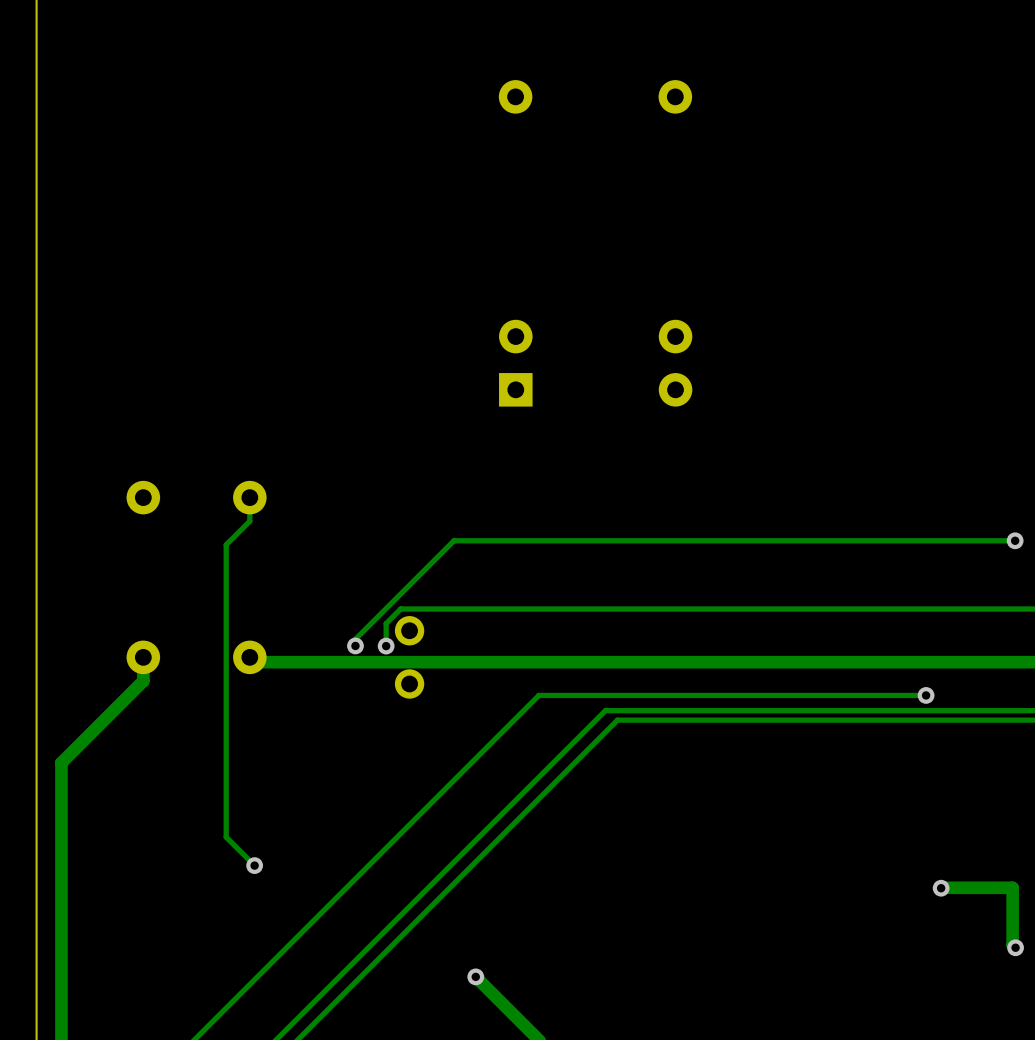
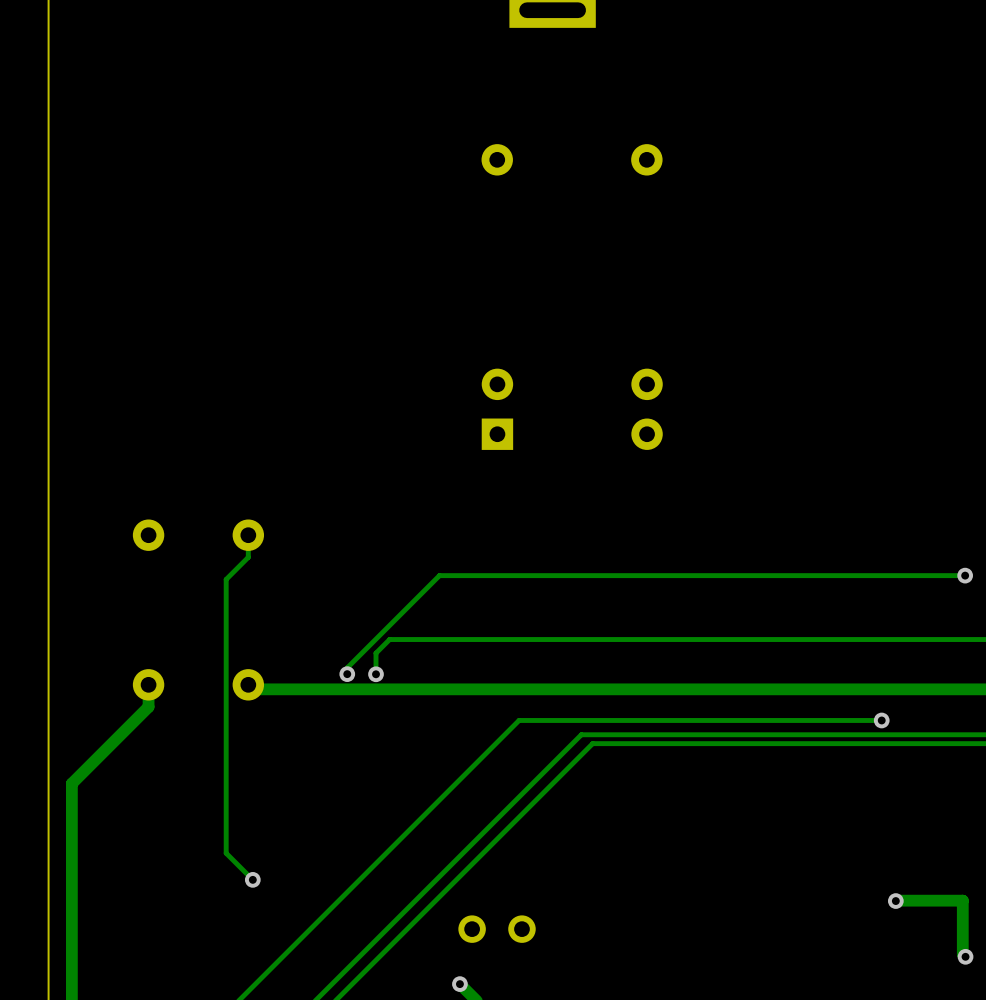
part rotation: 0° (409, 657) -> 90° clockwise (497, 929)
part position: (409, 657) -> (497, 929)

